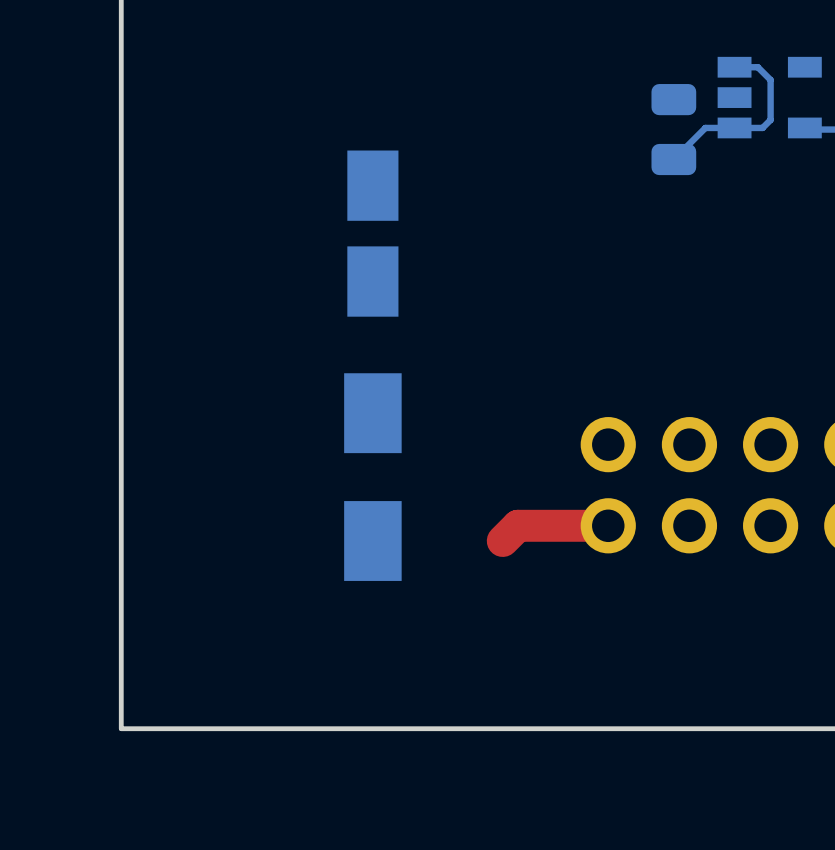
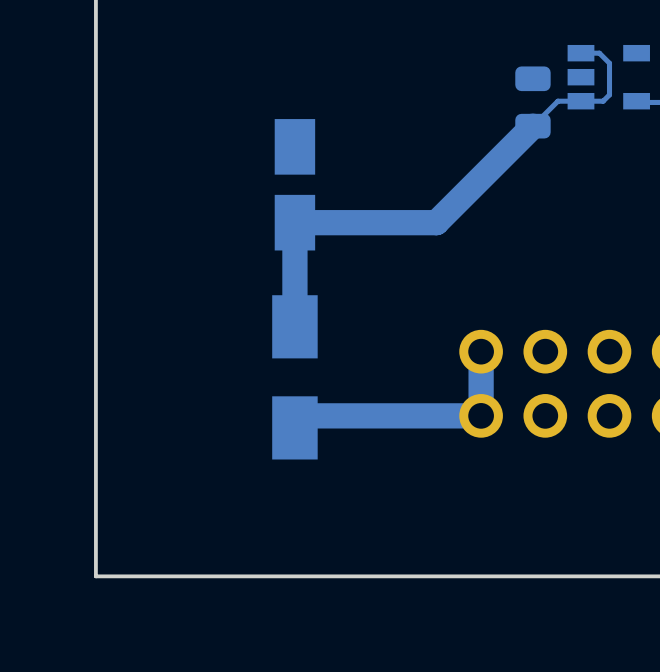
bottom track: none -> (532, 126) (436, 222) (294, 222) (294, 326)
bottom track: none -> (481, 351) (481, 415) (306, 415) (294, 427)
top track: (608, 525) (517, 525) (502, 541) -> none

